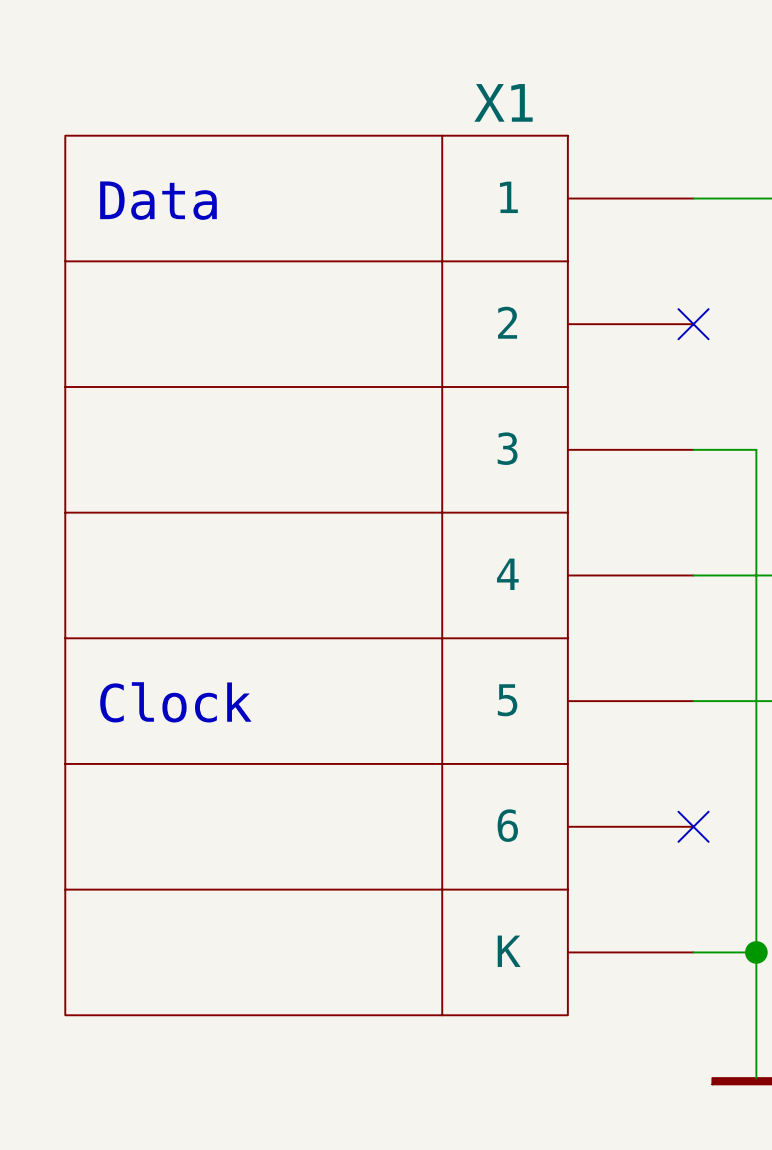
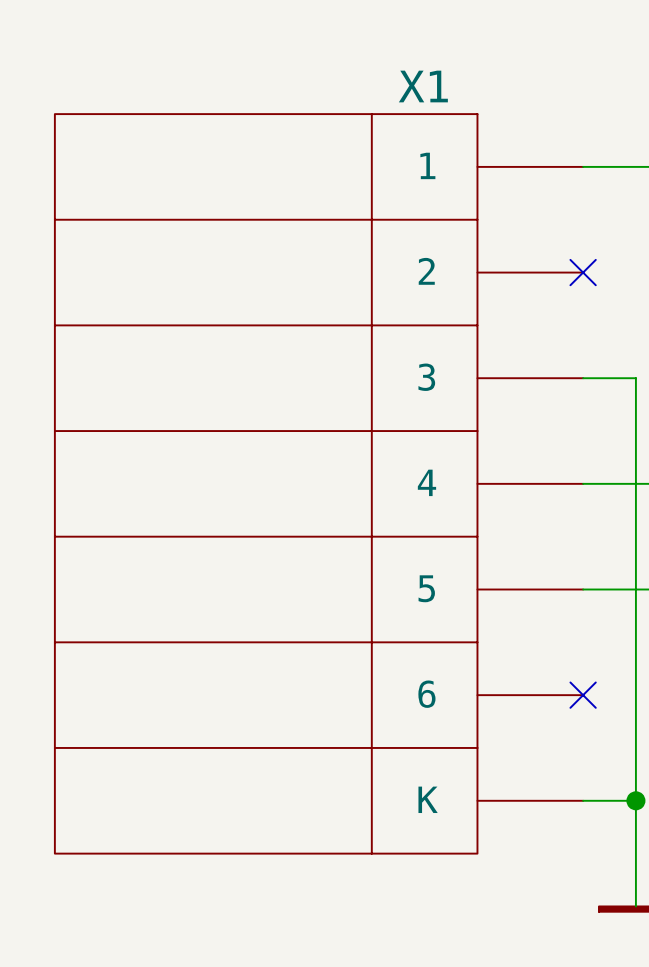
text: Data (158, 200) -> none
text: Clock (175, 702) -> none

